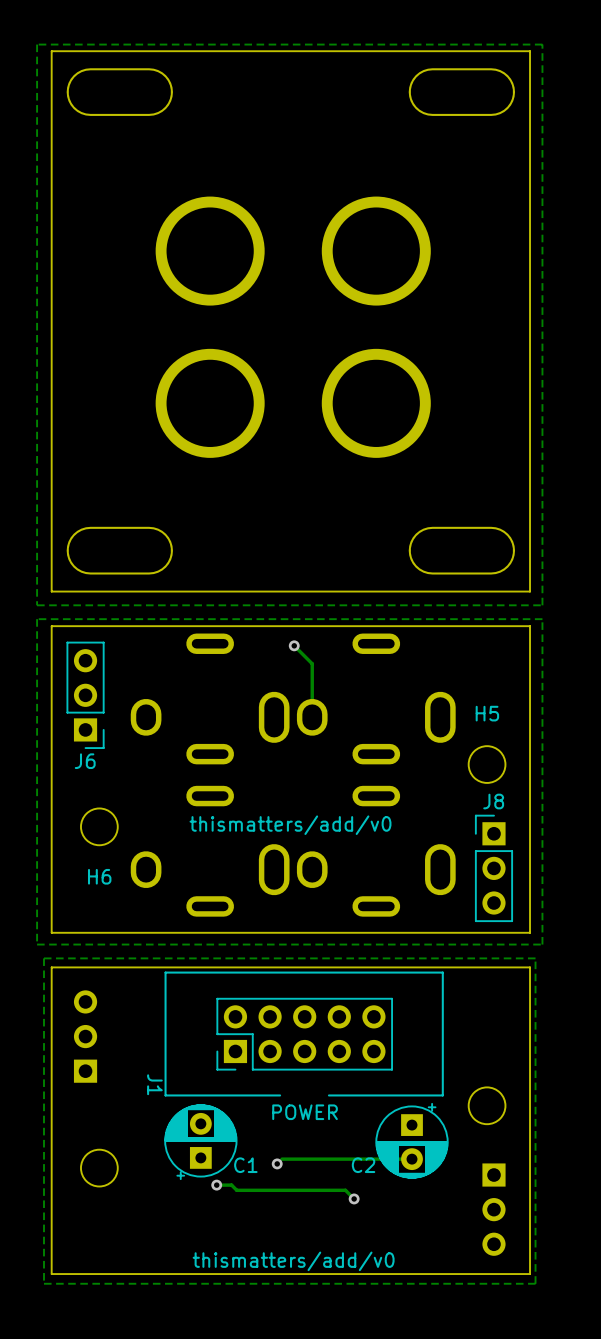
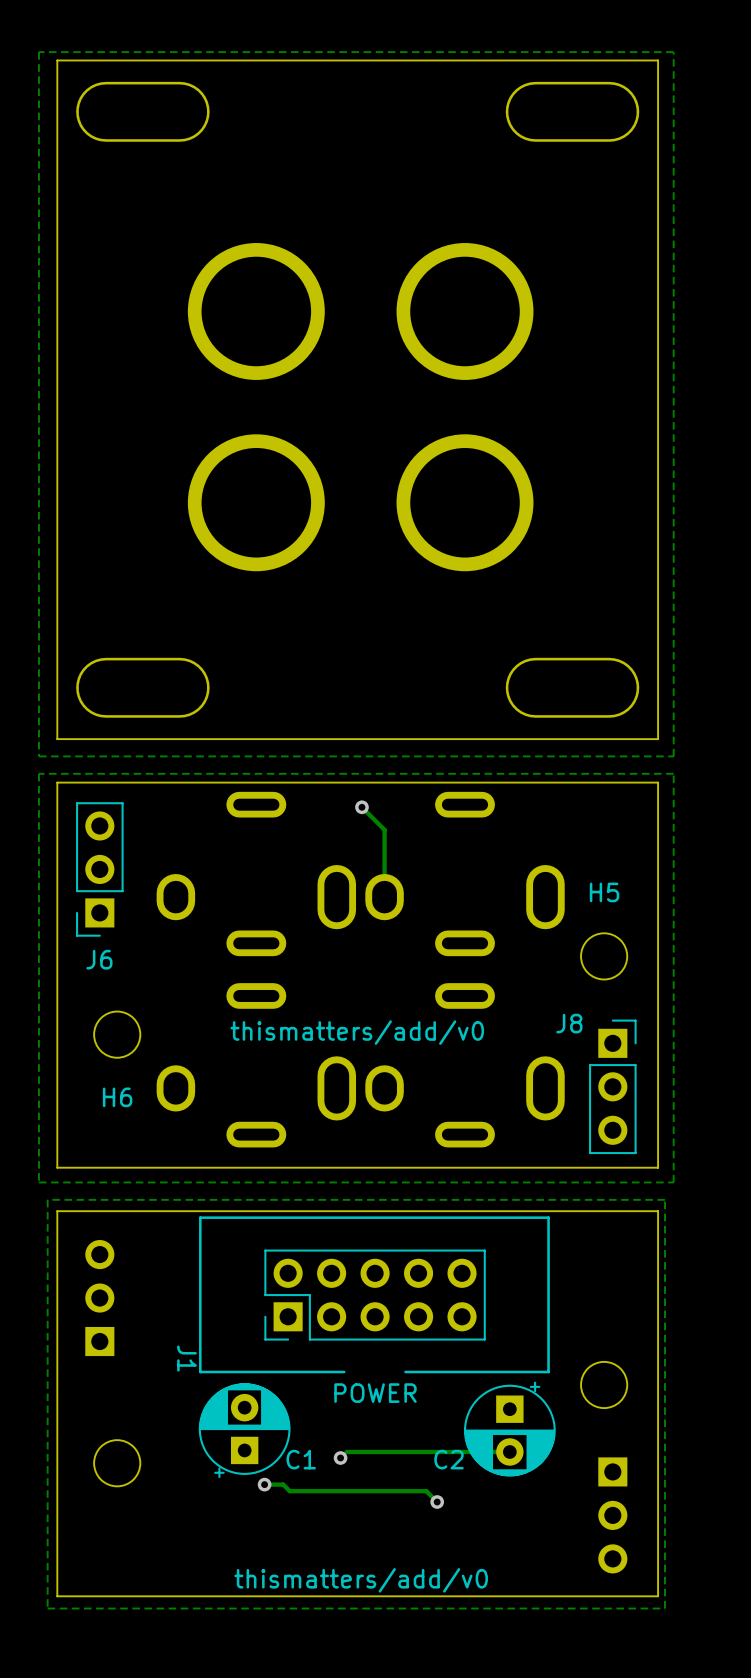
J6 footprint: [66, 641, 105, 749] -> [76, 802, 124, 937]
J8 name position: J8 (493, 801) -> J8 (569, 1023)
J8 footprint: [475, 814, 513, 922] -> [589, 1019, 637, 1155]

